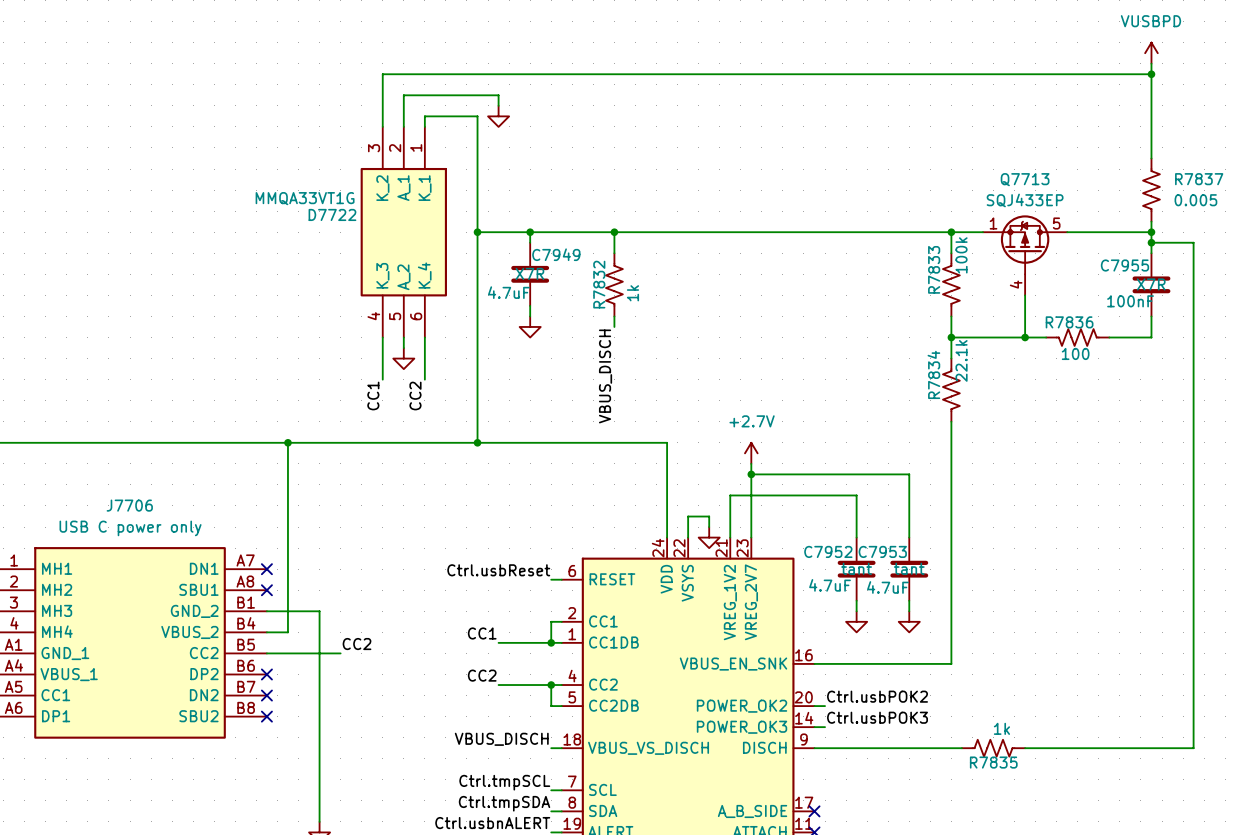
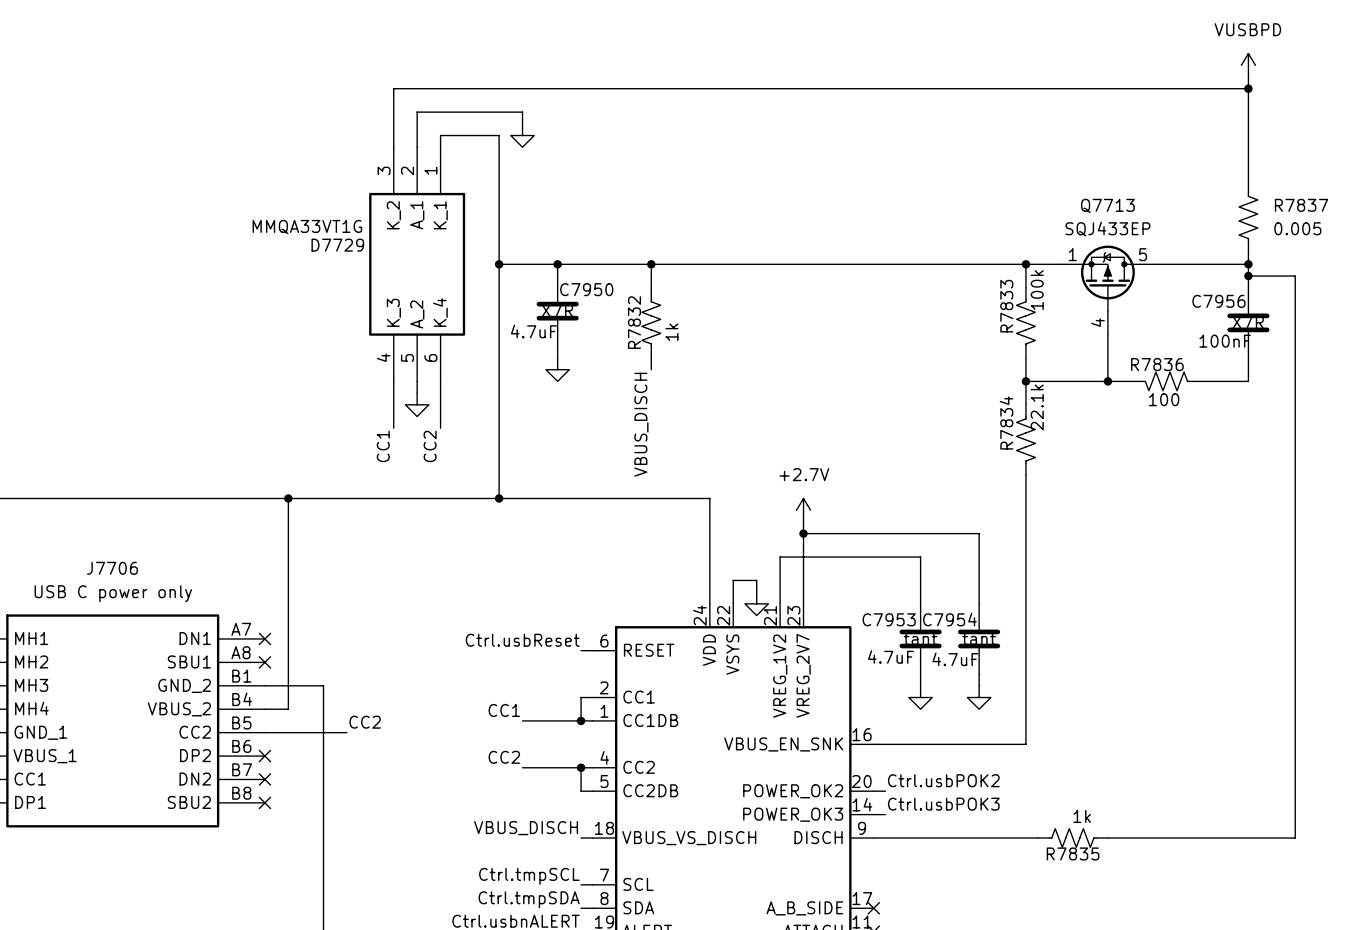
D7722 name: D7722 (332, 214) -> D7729 (337, 245)
C7949 name: C7949 (556, 254) -> C7950 (586, 289)
C7955 name: C7955 (1124, 265) -> C7956 (1218, 301)
C7952 name: C7952 (828, 551) -> C7953 (889, 619)
C7953 name: C7953 (882, 551) -> C7954 (949, 619)

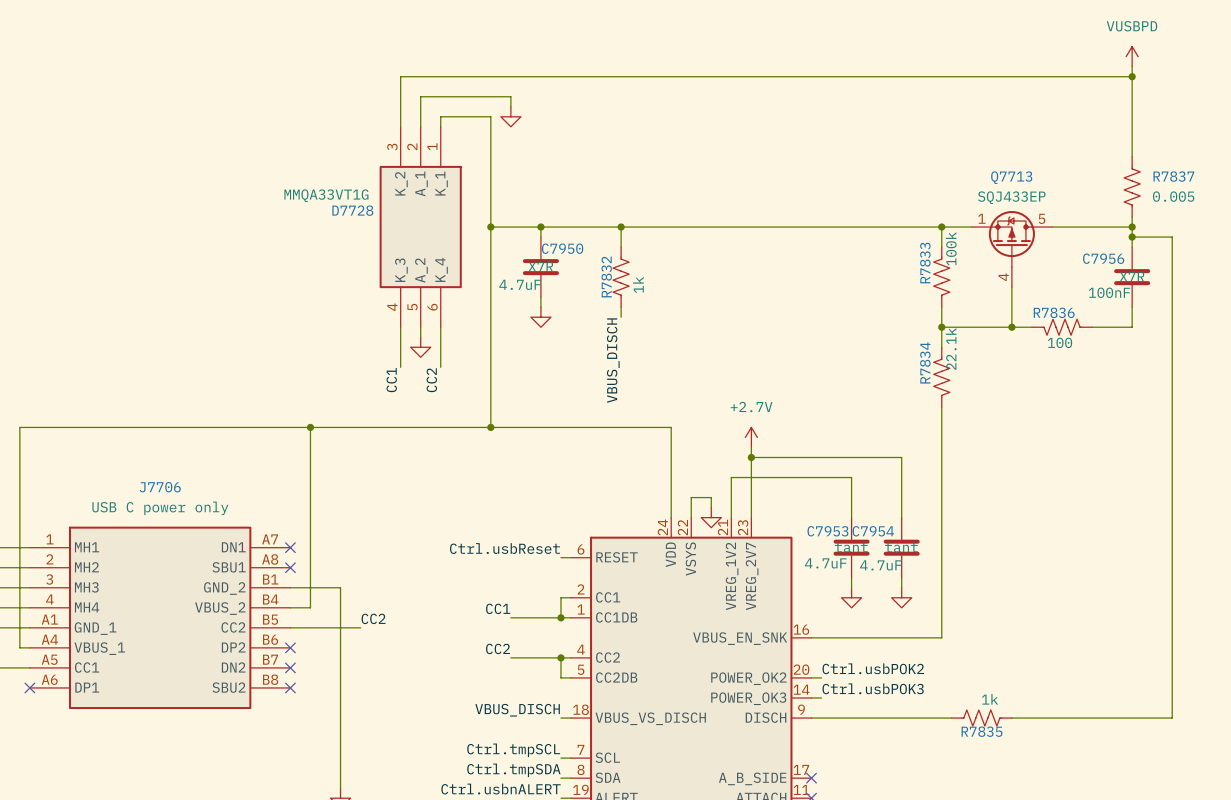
D7729 name: D7729 (337, 245) -> D7728 (352, 210)

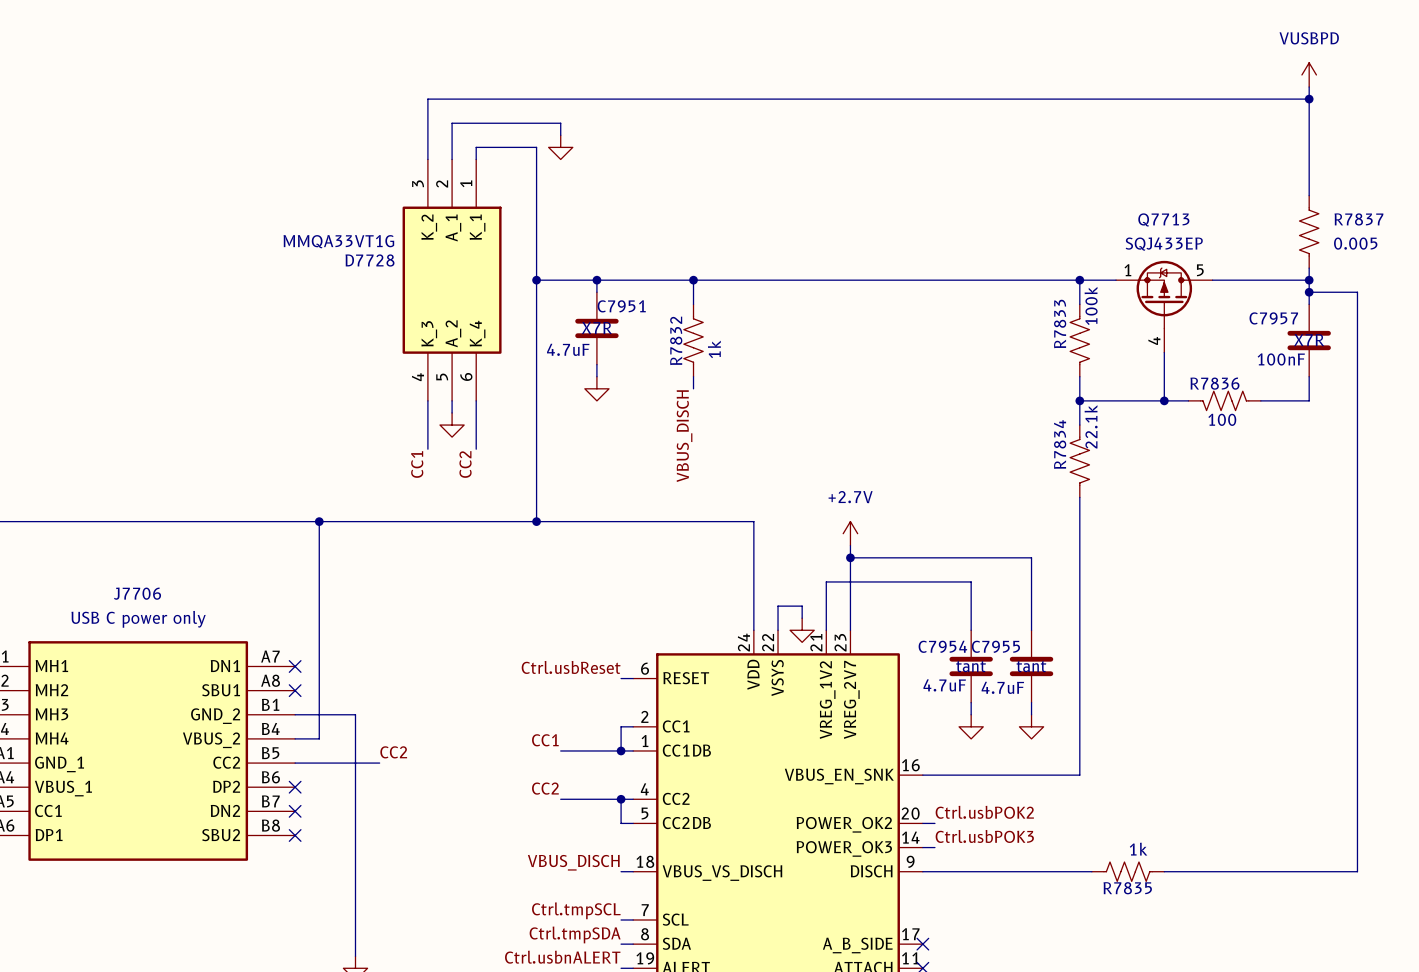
C7950 name: C7950 (562, 248) -> C7951 (621, 306)
C7956 name: C7956 (1103, 258) -> C7957 (1273, 318)
C7953 name: C7953 (827, 531) -> C7954 (942, 646)
C7954 name: C7954 (873, 531) -> C7955 (995, 646)

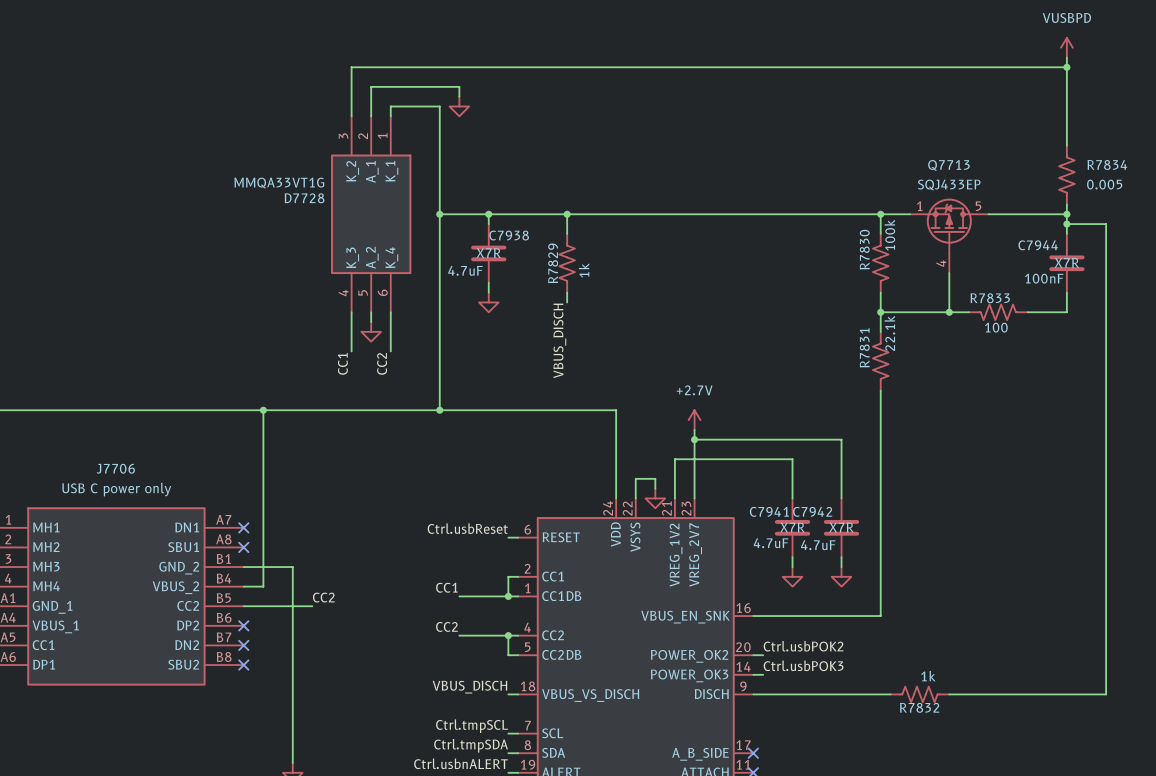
R7837 name: R7837 (1358, 219) -> R7834 (1107, 164)
C7951 name: C7951 (621, 306) -> C7938 (509, 235)
C7957 name: C7957 (1273, 318) -> C7944 (1038, 245)
R7833 name: R7833 (1060, 323) -> R7830 (864, 249)
R7832 name: R7832 (676, 340) -> R7829 (553, 263)
R7836 name: R7836 (1214, 383) -> R7833 (990, 298)
R7834 name: R7834 (1060, 444) -> R7831 (864, 347)
C7954 name: C7954 (942, 646) -> C7941 (769, 511)
C7955 name: C7955 (995, 646) -> C7942 (812, 511)
C7954 text: tant (971, 666) -> X7R (792, 527)
C7955 text: tant (1031, 666) -> X7R (841, 527)
R7835 name: R7835 (1127, 888) -> R7832 (919, 707)

